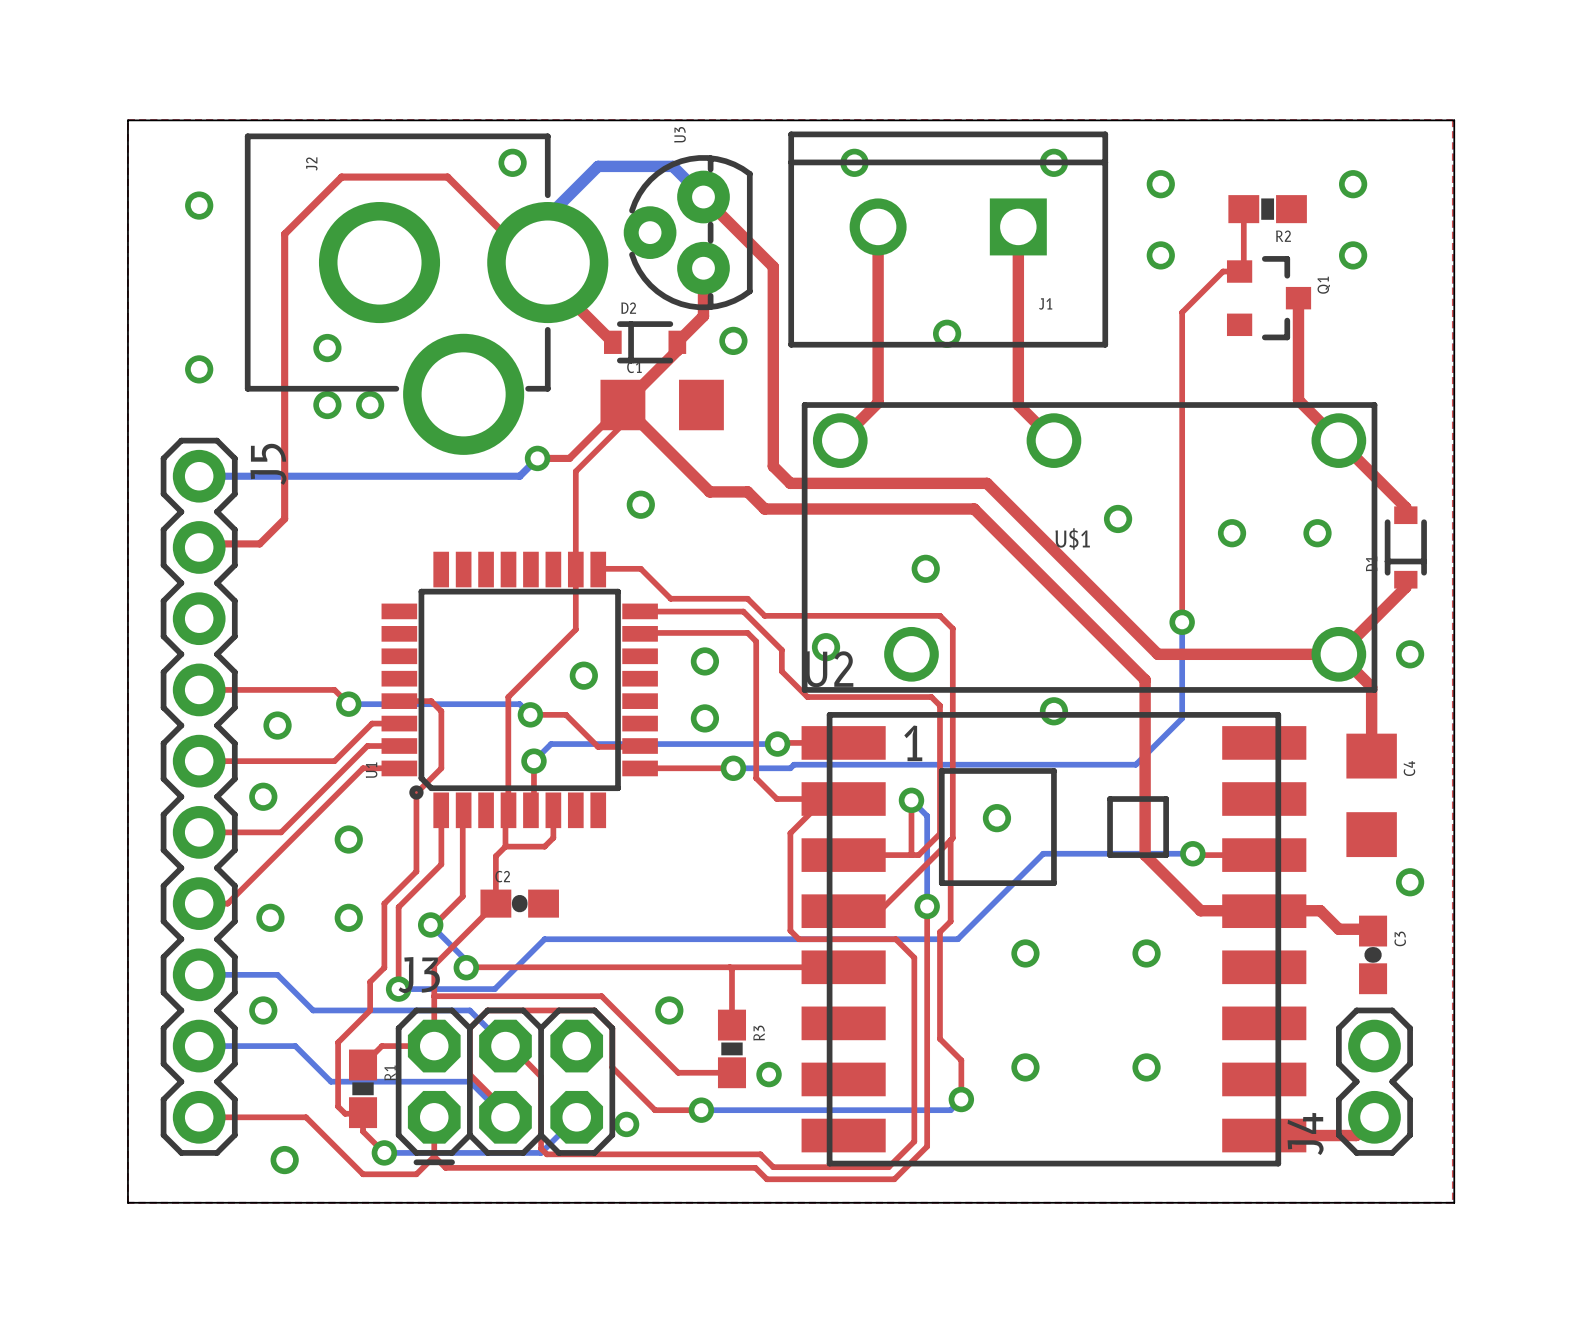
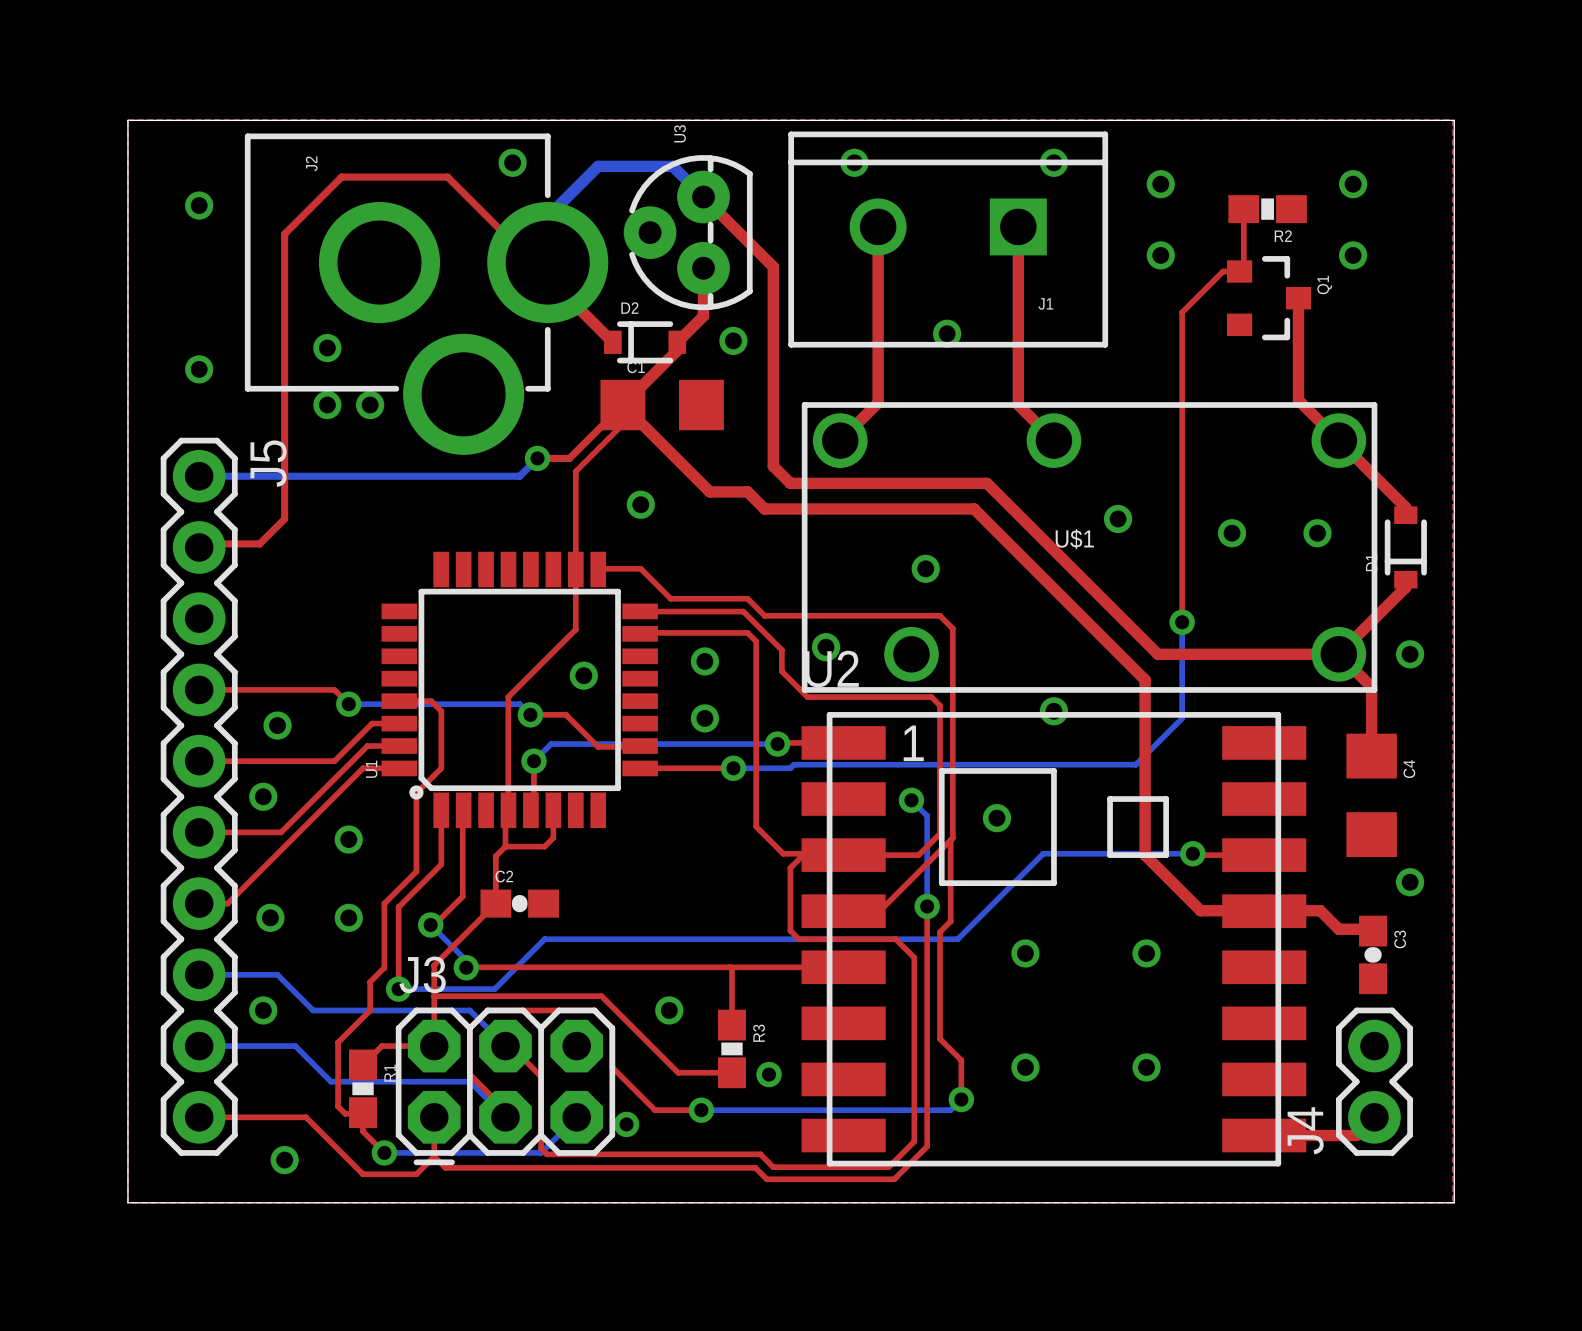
top track: (756, 778) (776, 799) (843, 799) -> (756, 778) (756, 826) (783, 853) (843, 855)
top track: (824, 799) (790, 833) (790, 868) -> (804, 853) (790, 868)
top track: (911, 800) (911, 855) -> none

